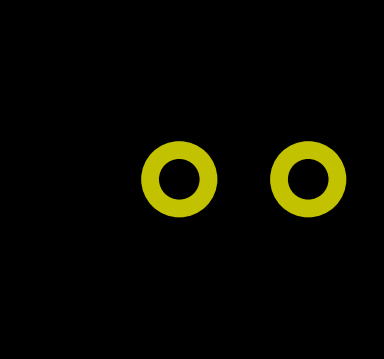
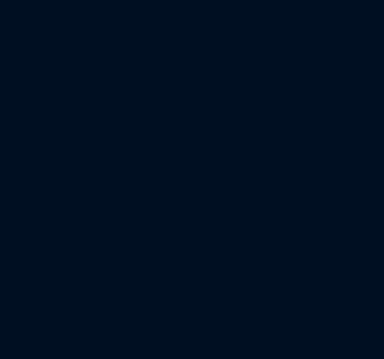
part: (243, 179) -> none

